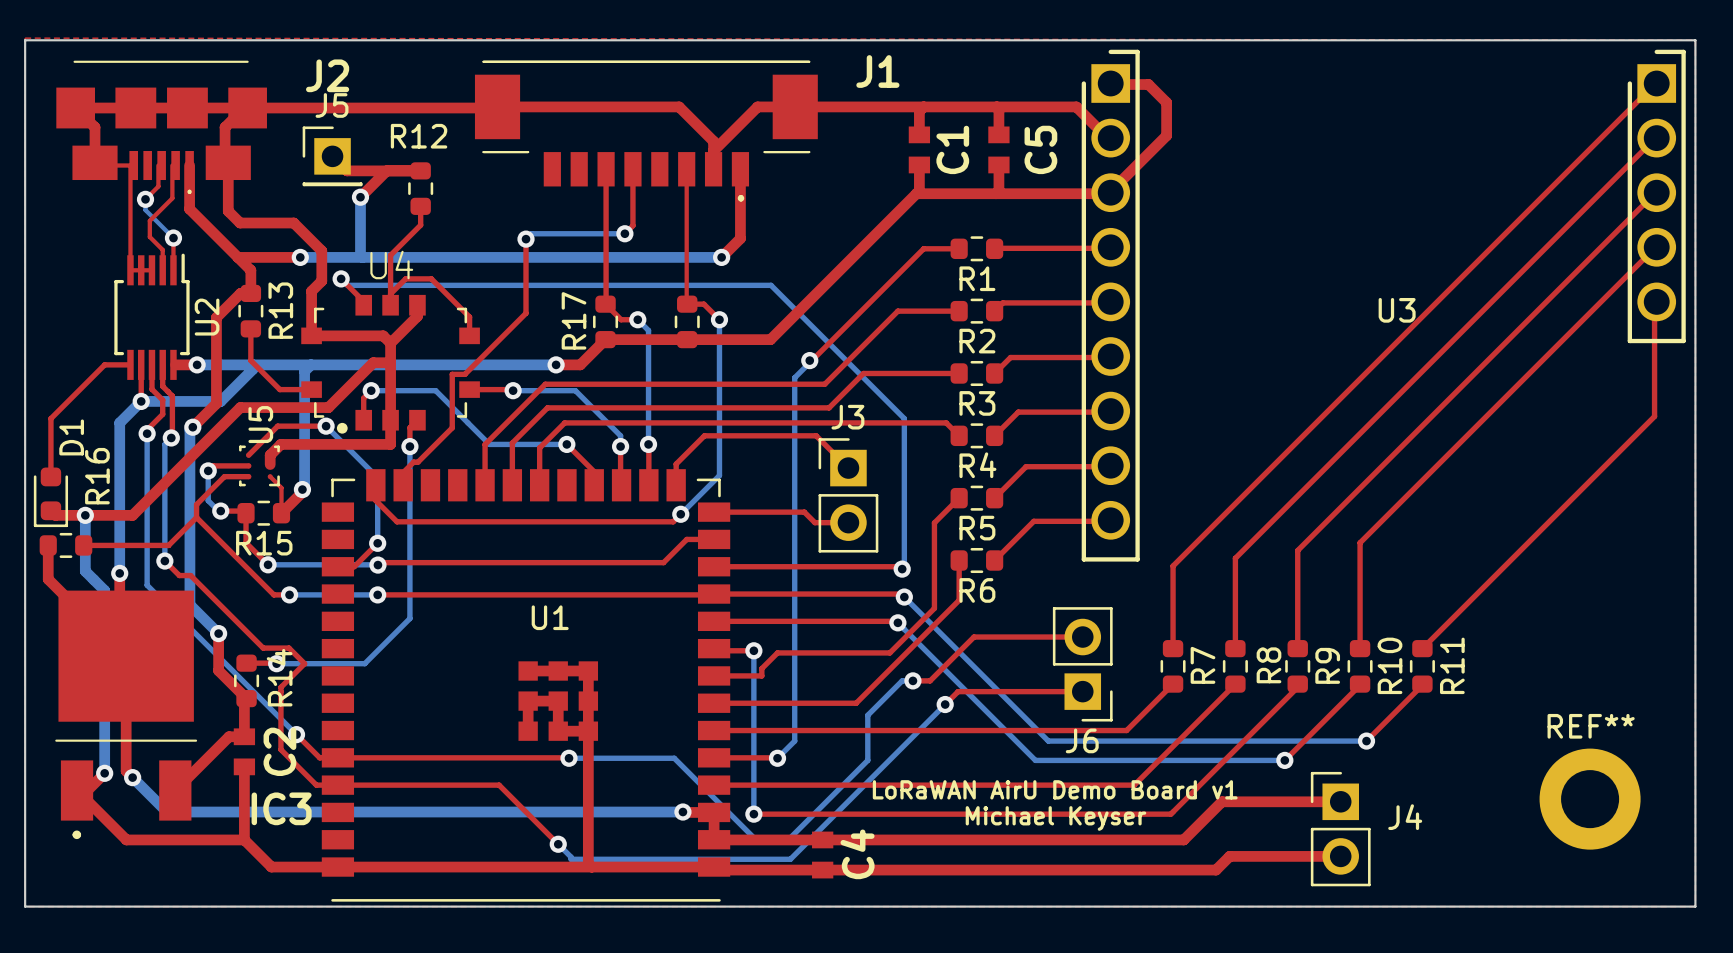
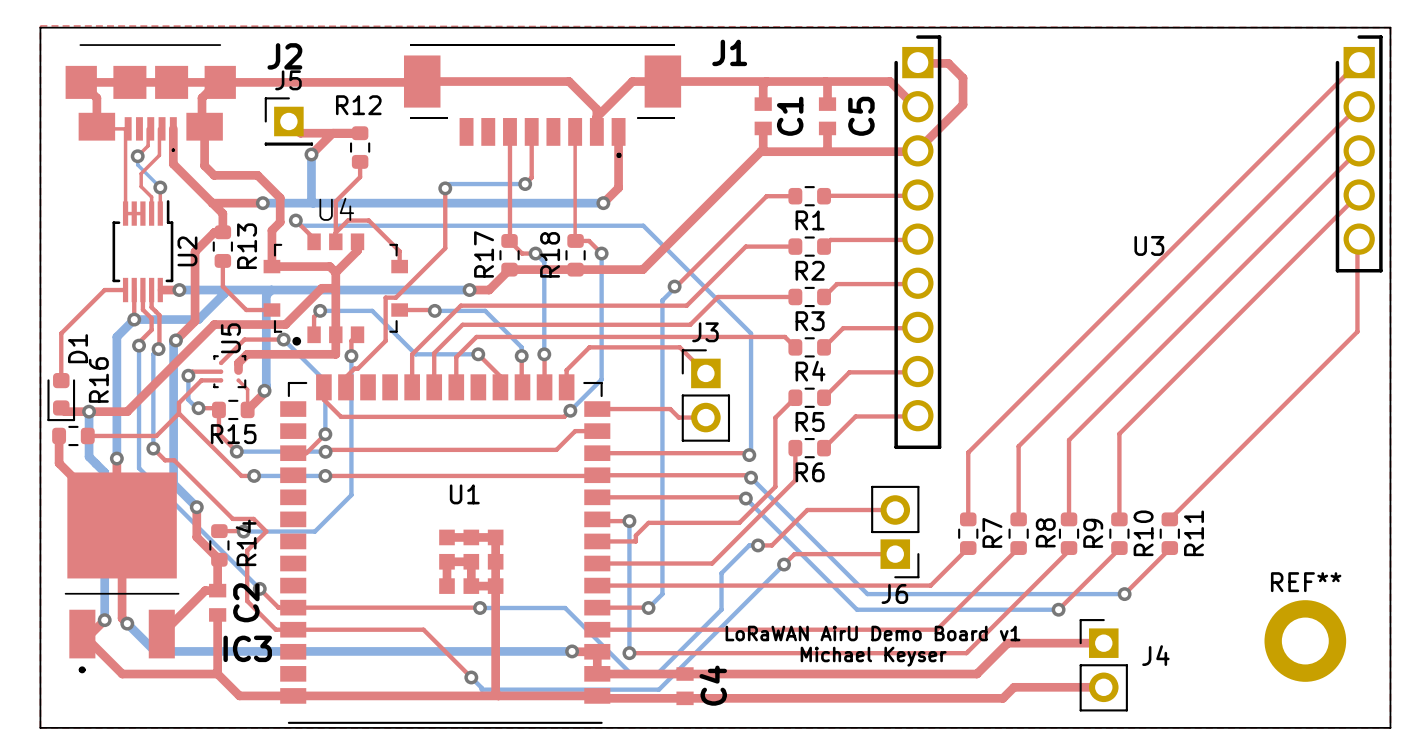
R18 name: none -> R18 (550, 254)

